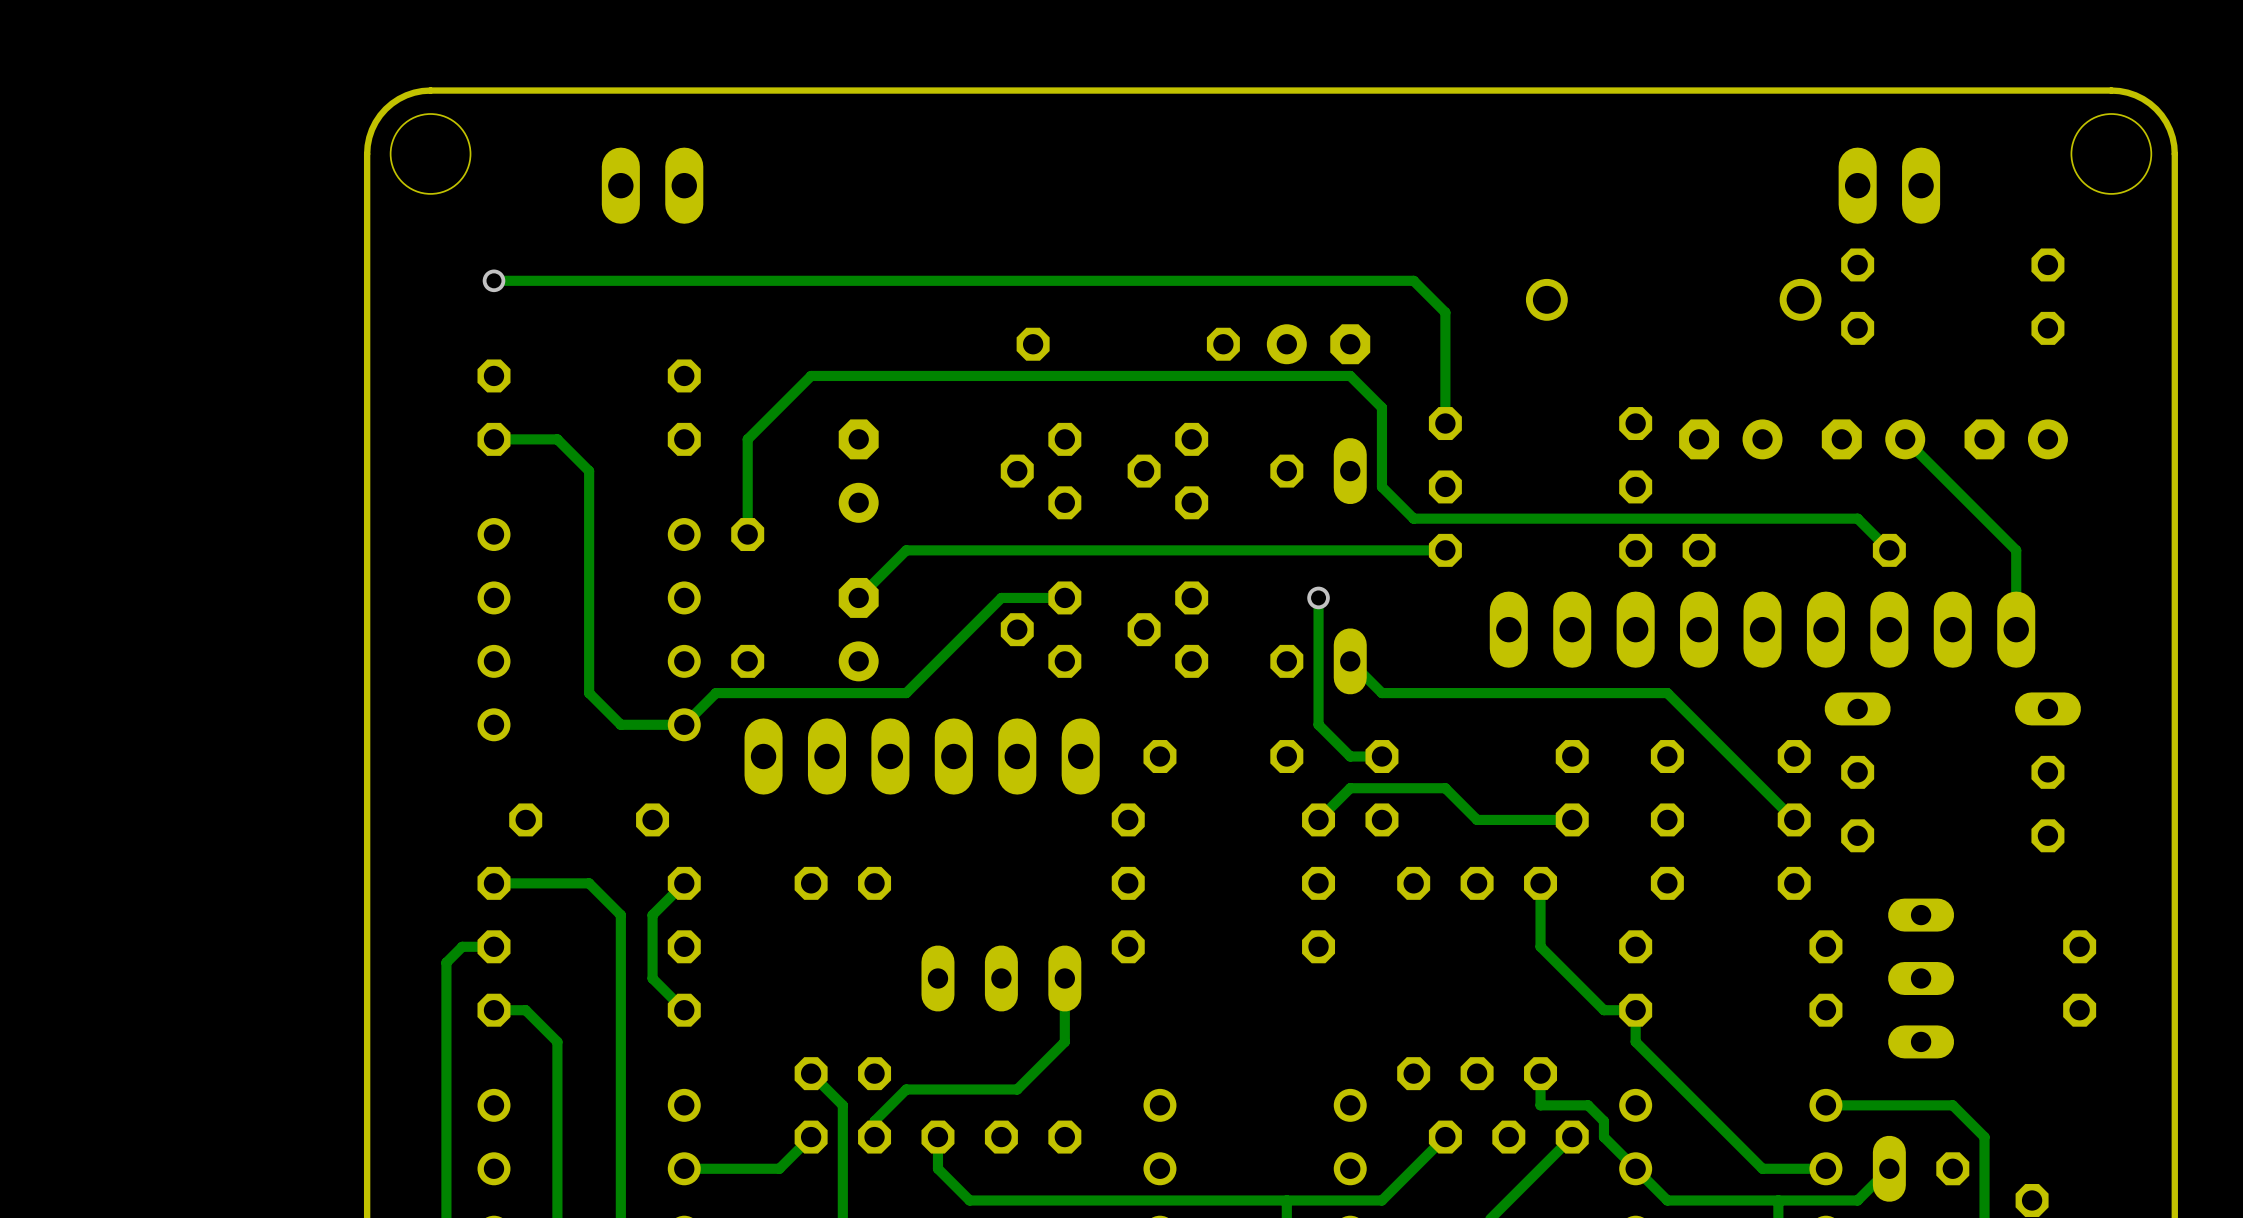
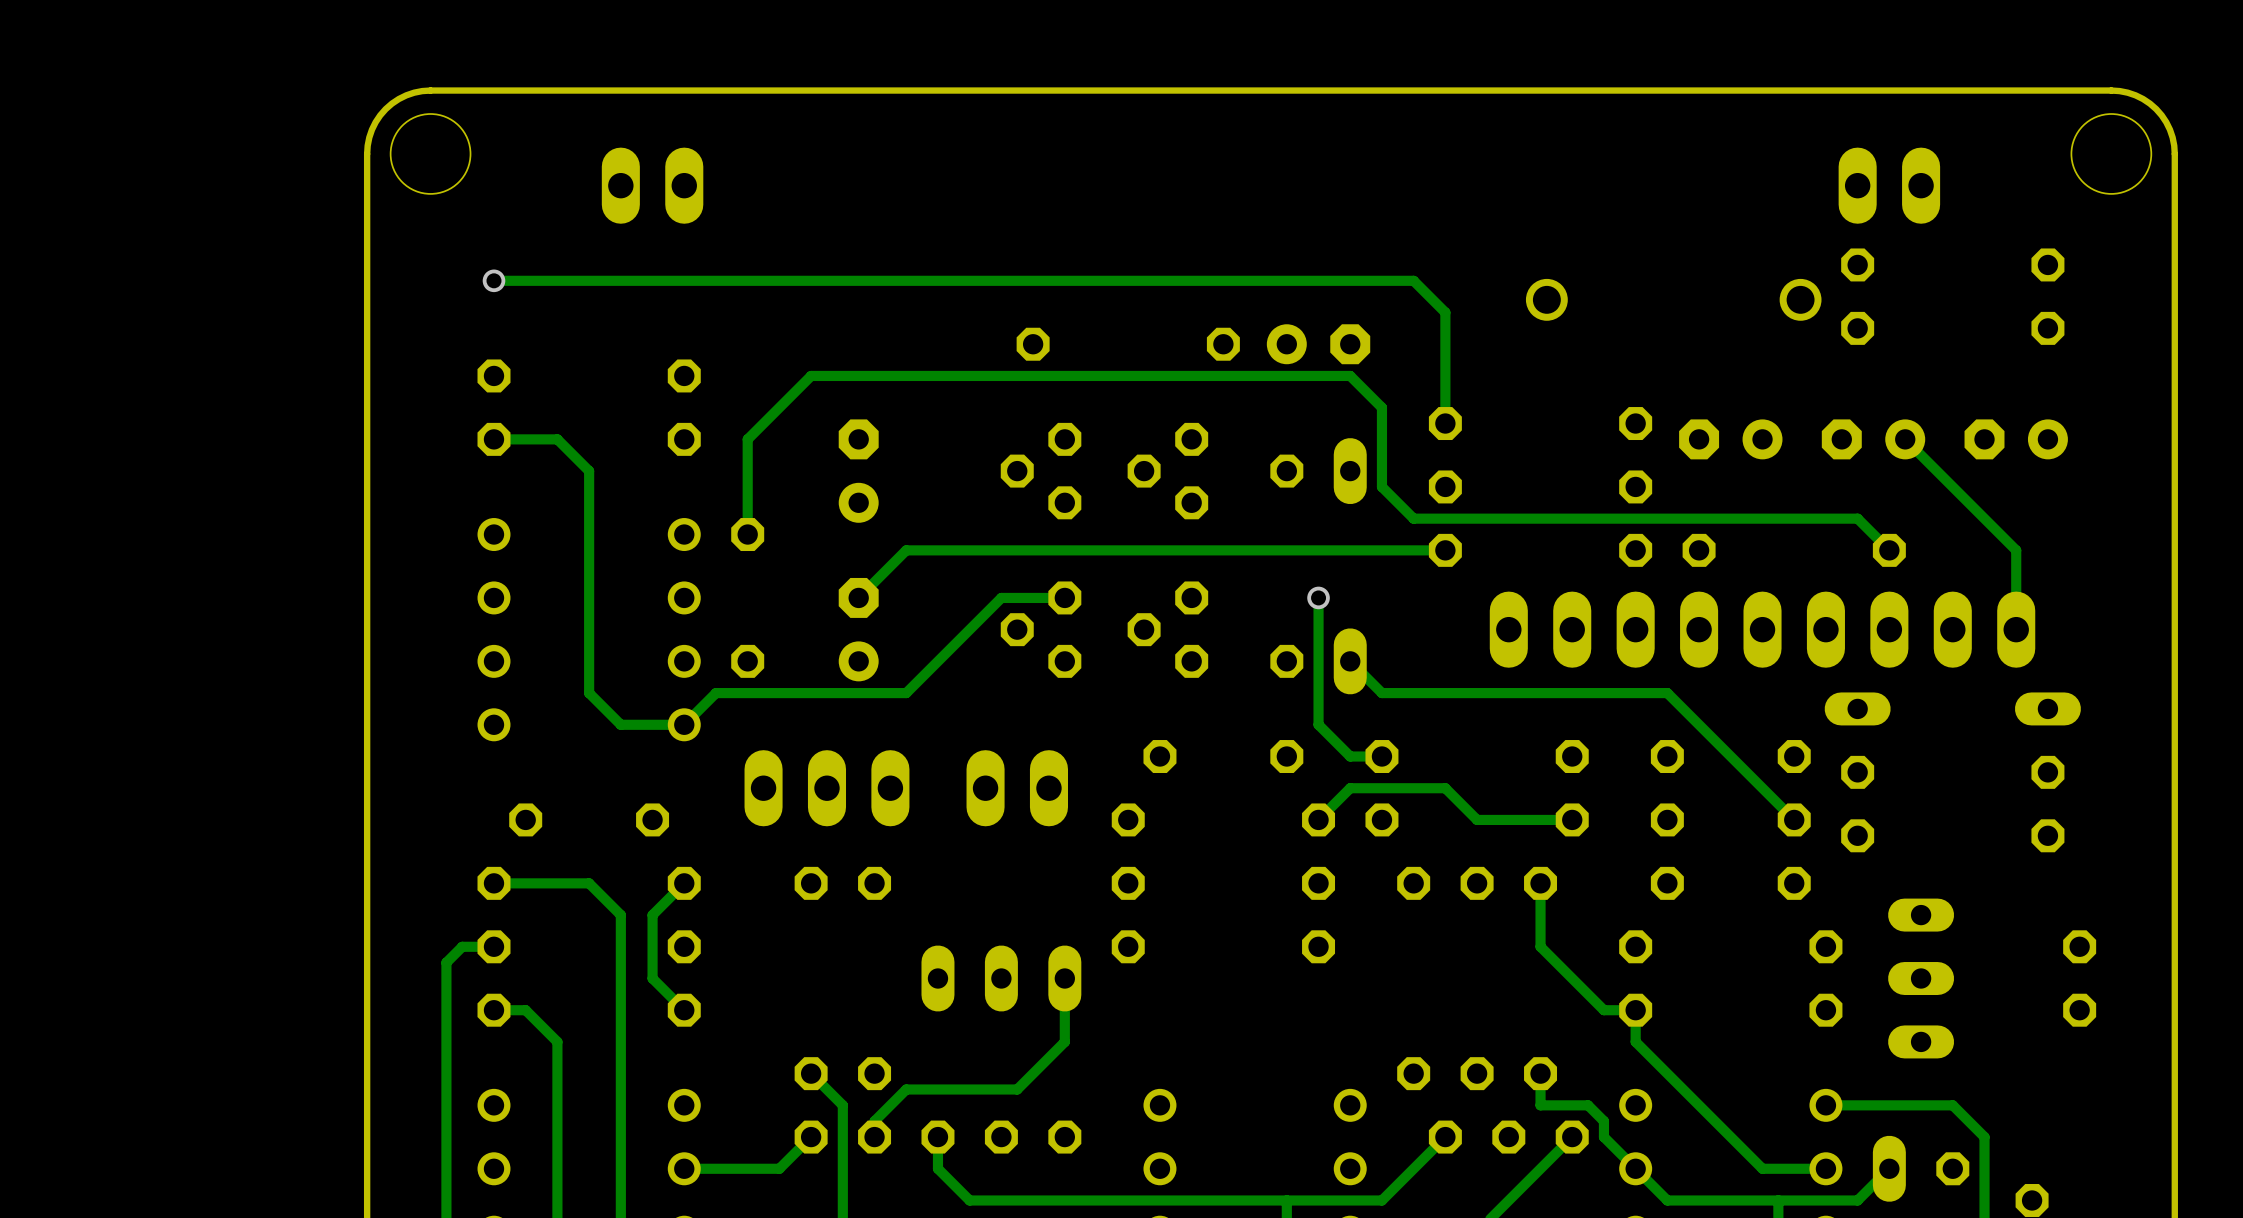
part position: (826, 756) -> (826, 788)
part: (1017, 756) -> none
part: none -> (1017, 788)

